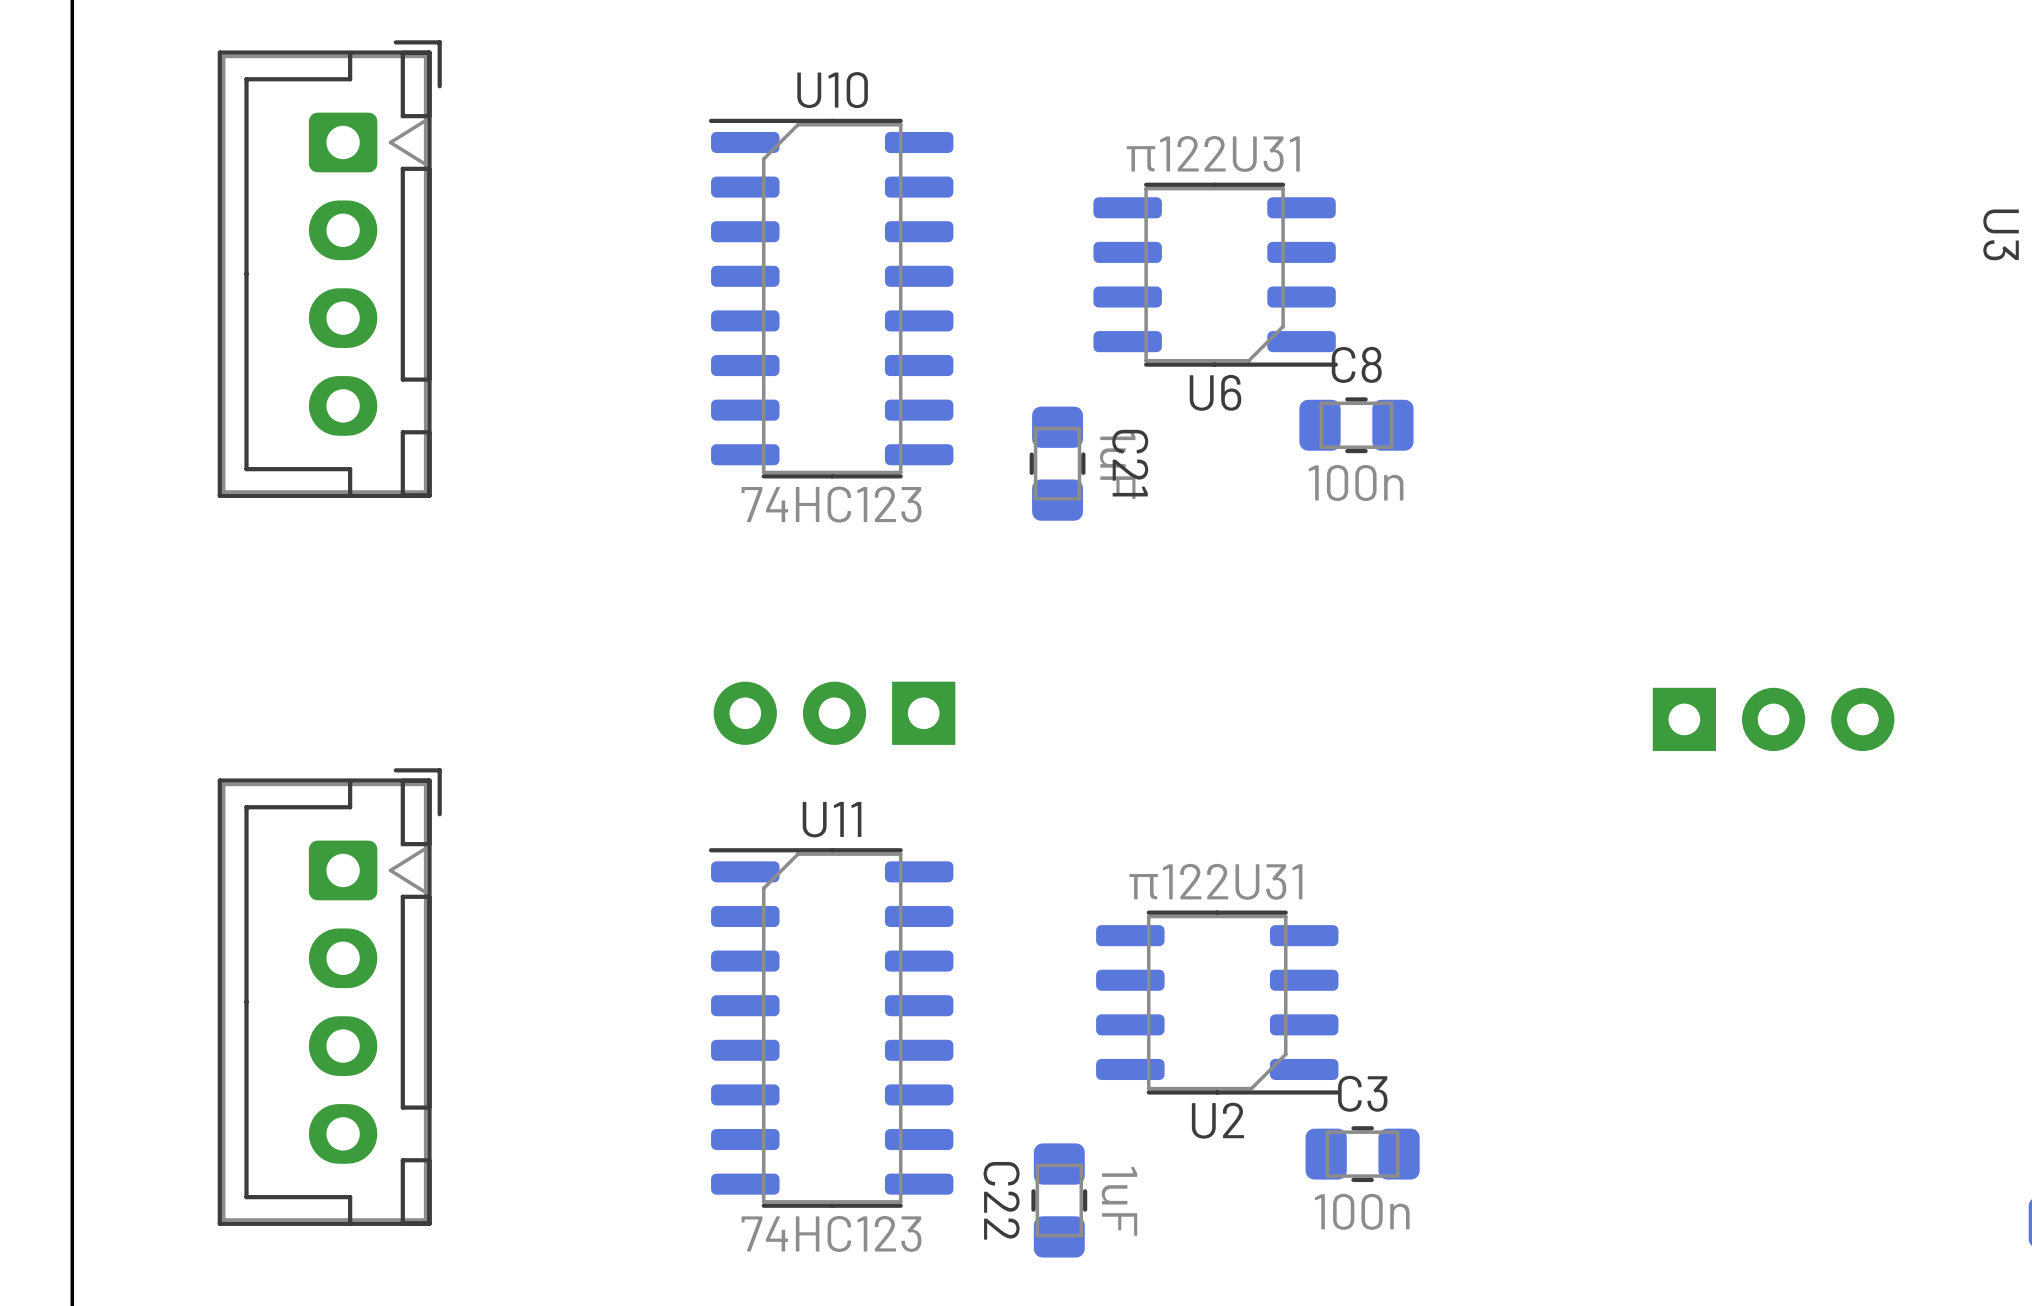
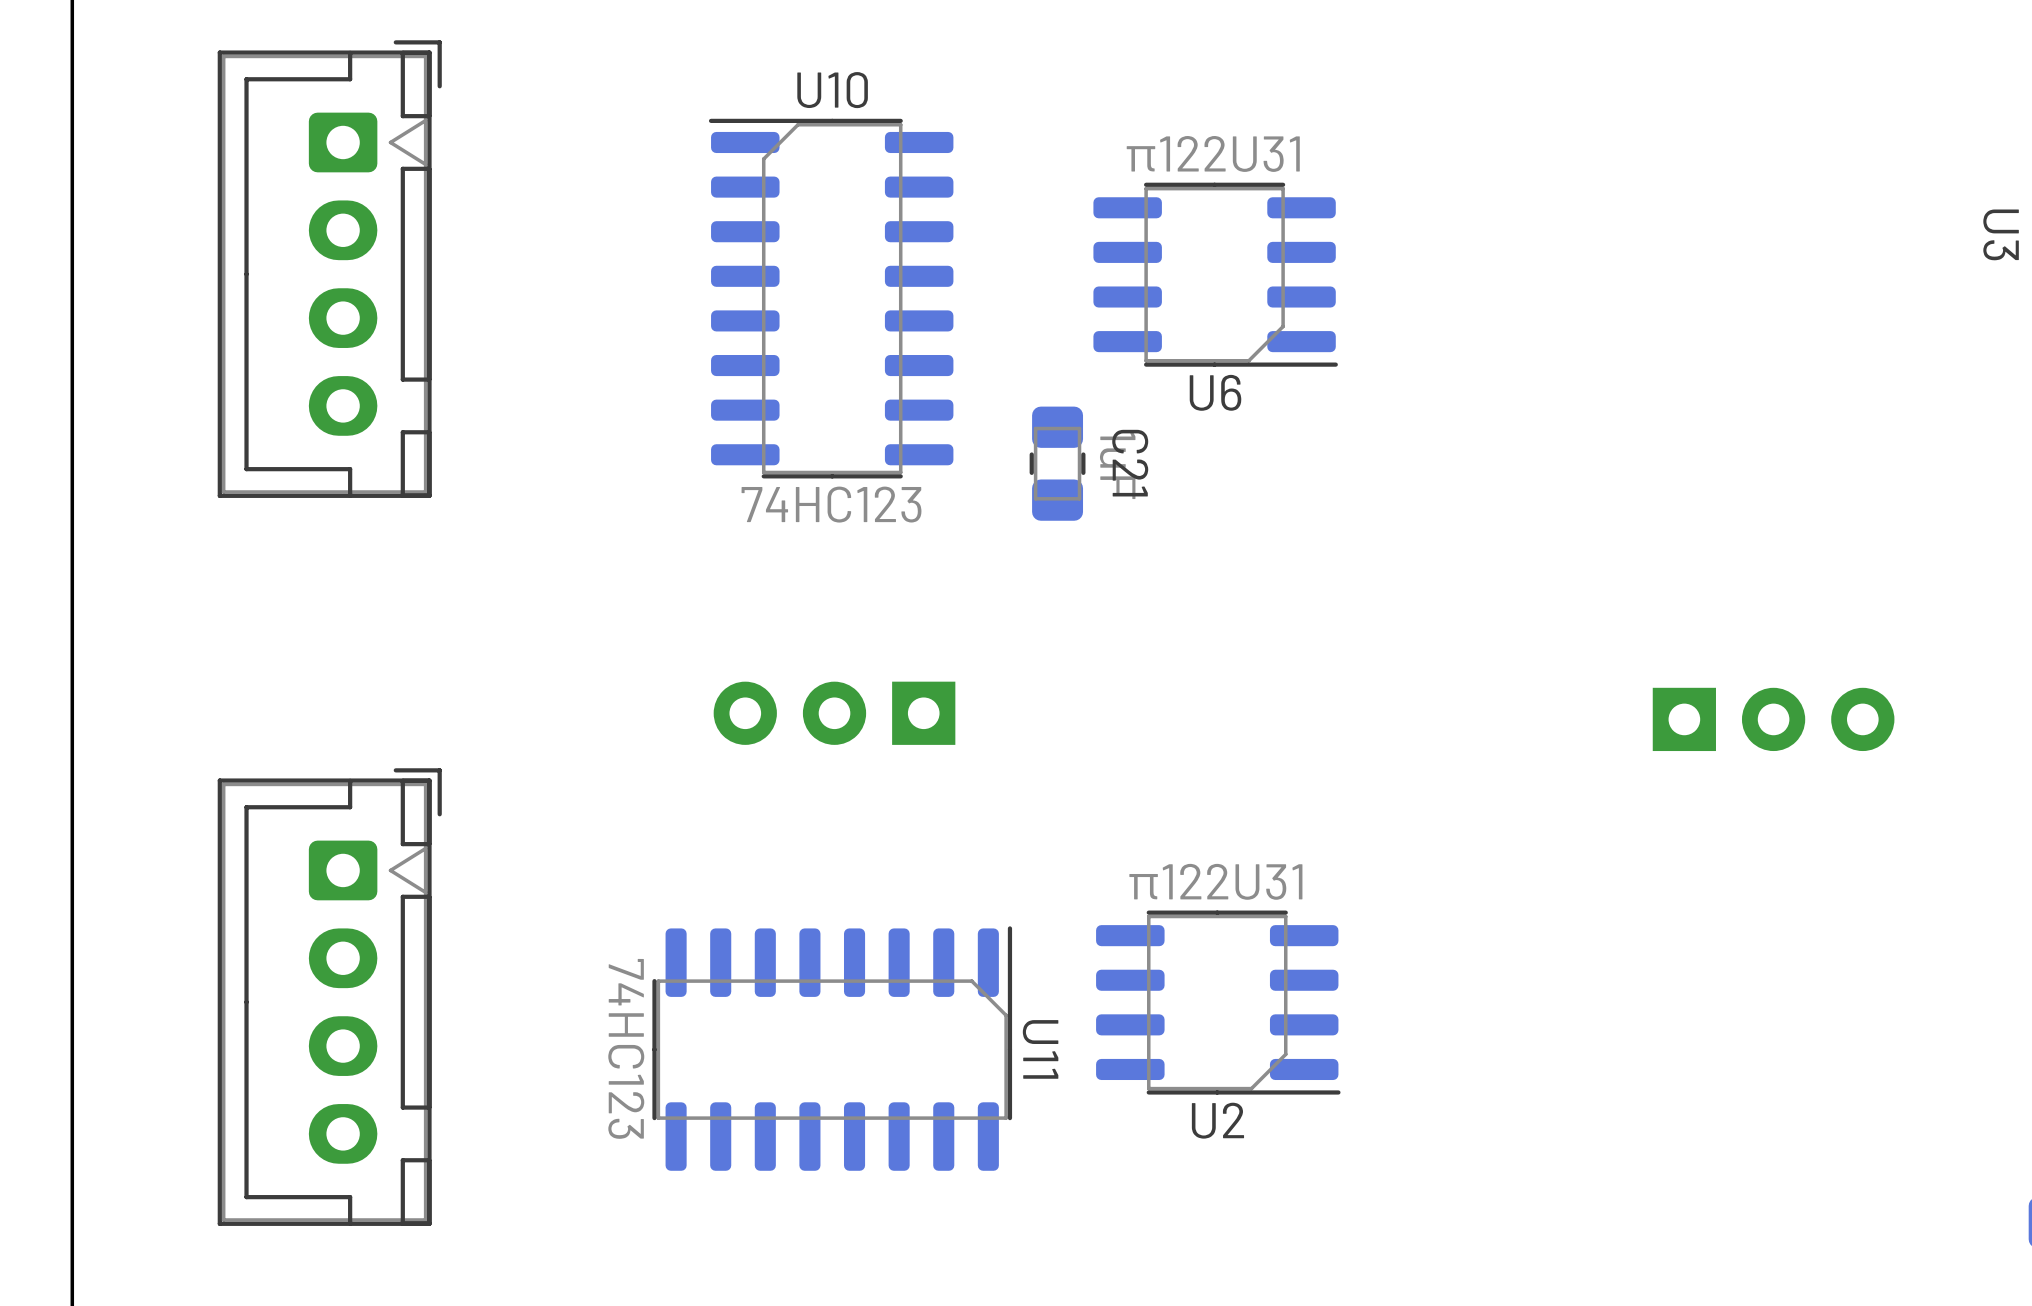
C8: 100n (1356, 425) -> none
U11 rotation: 0° (831, 1028) -> 90° clockwise (832, 1048)
C3: 100n (1362, 1154) -> none
C22: 1uF (1059, 1200) -> none

